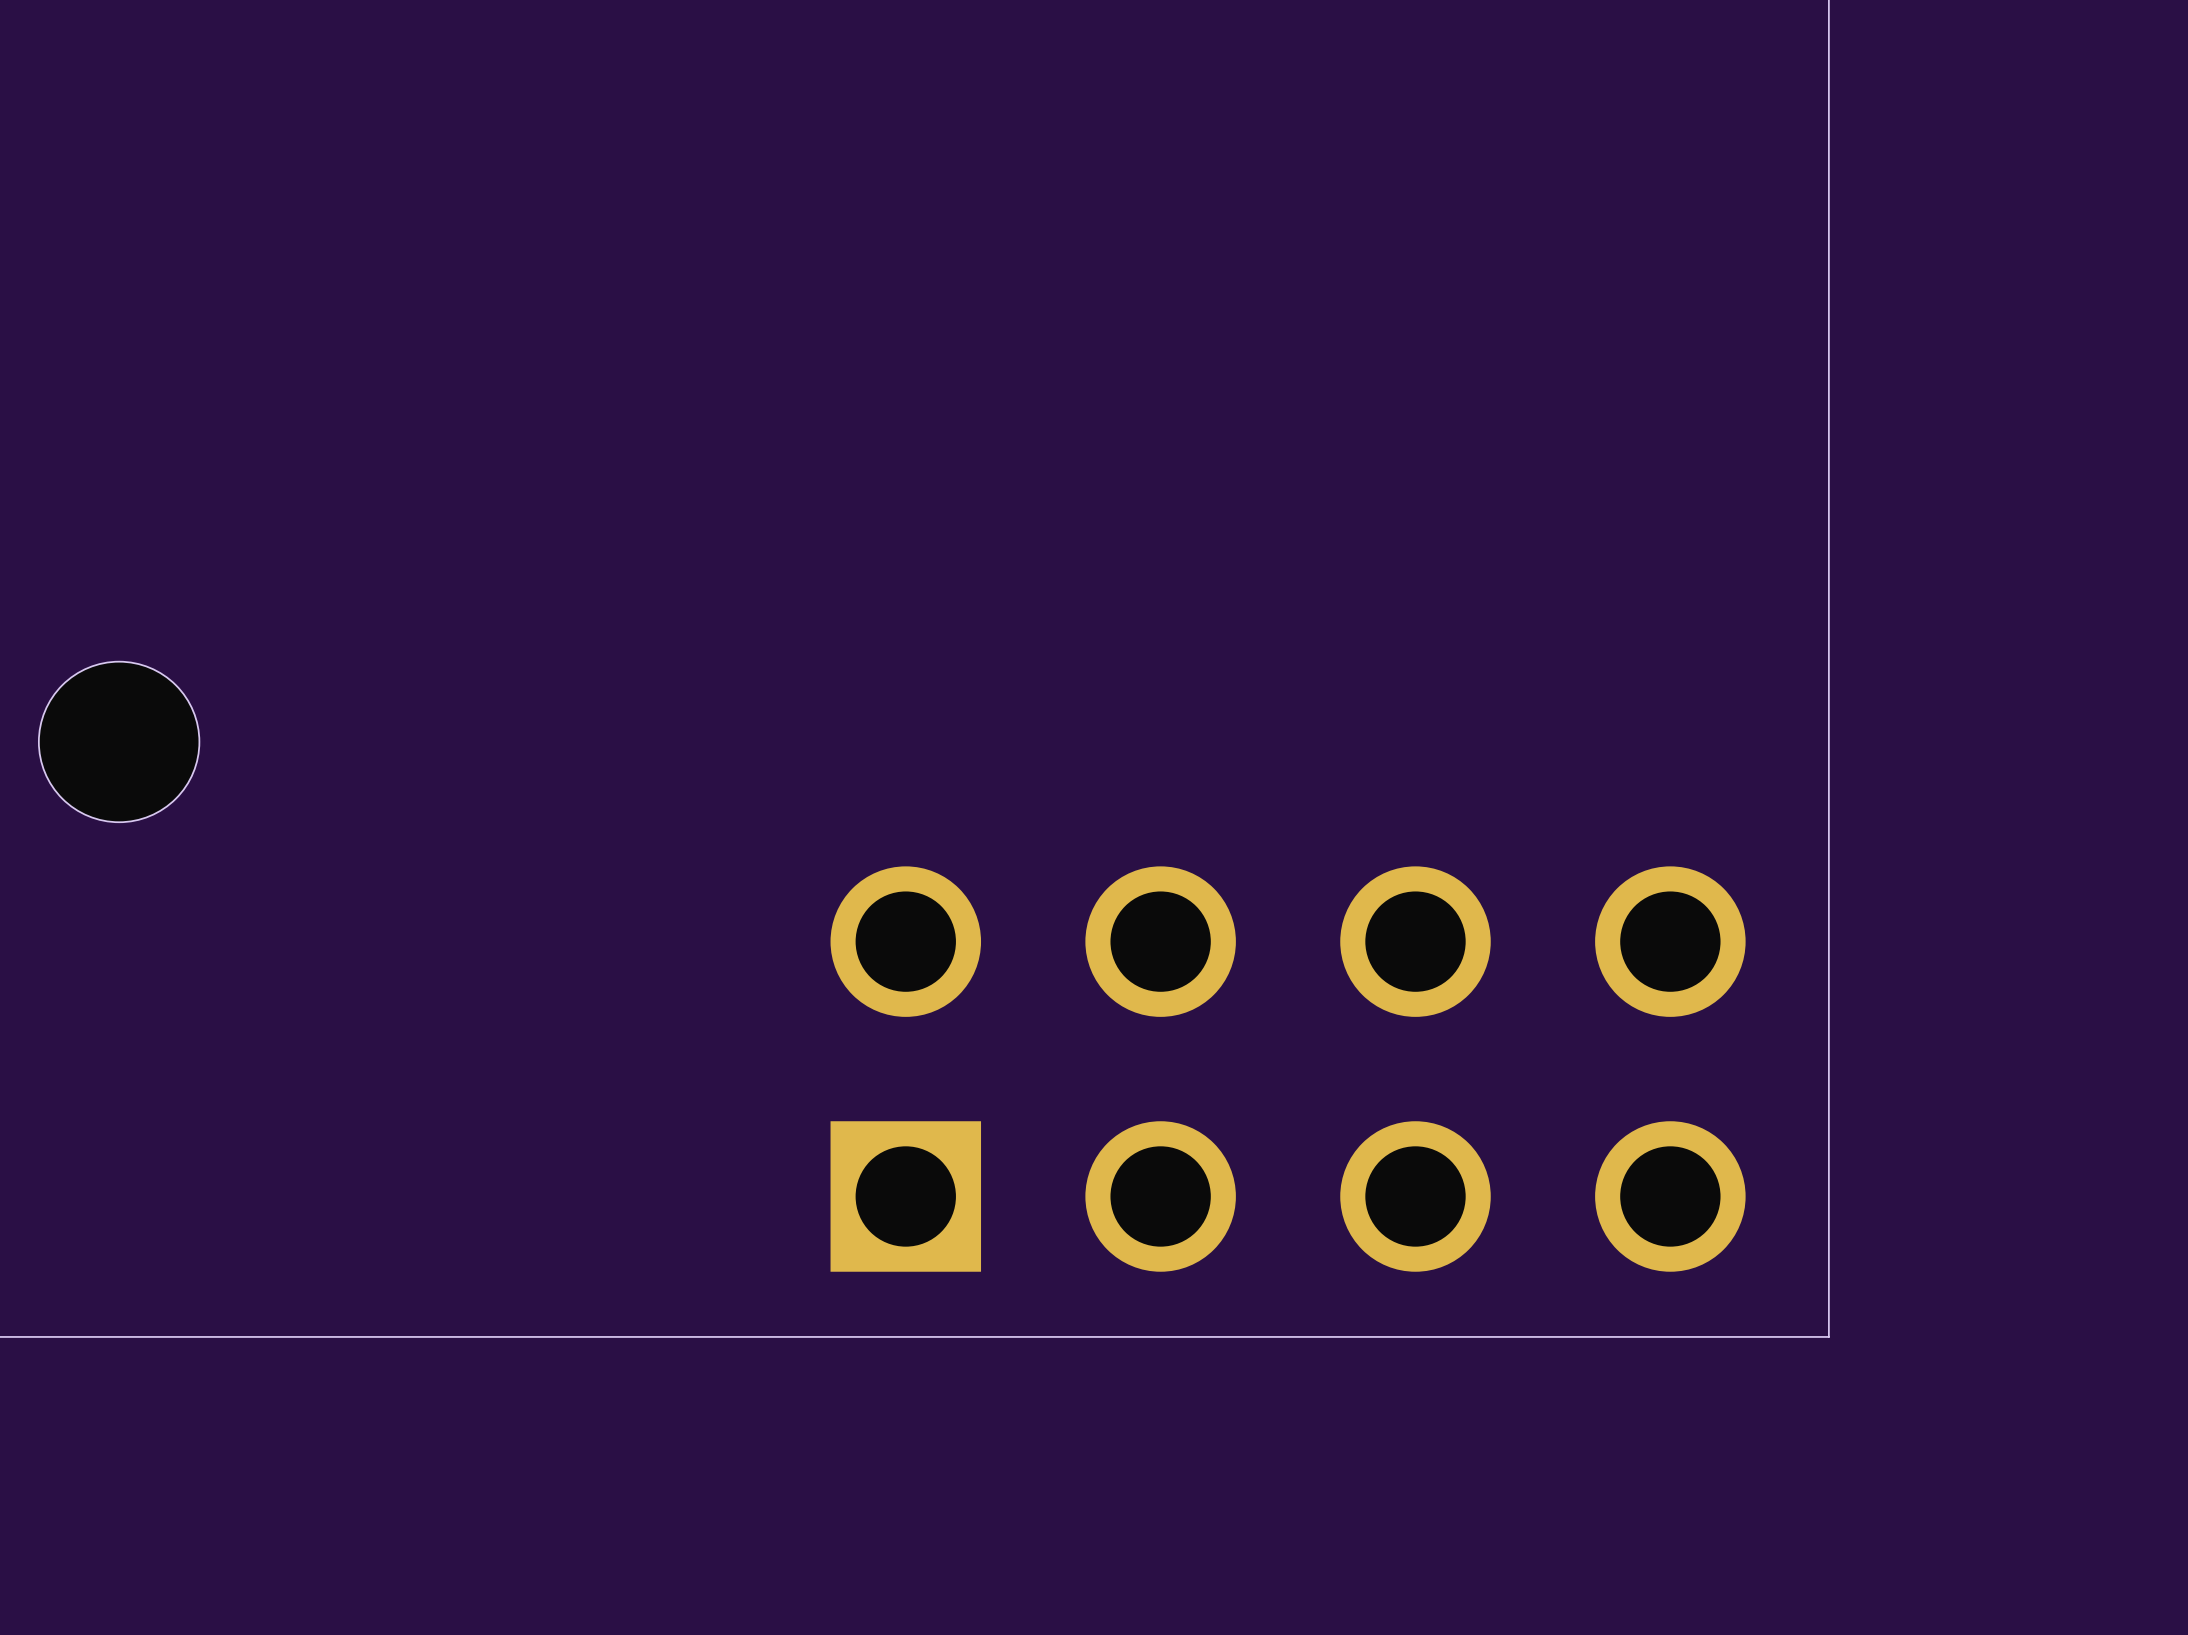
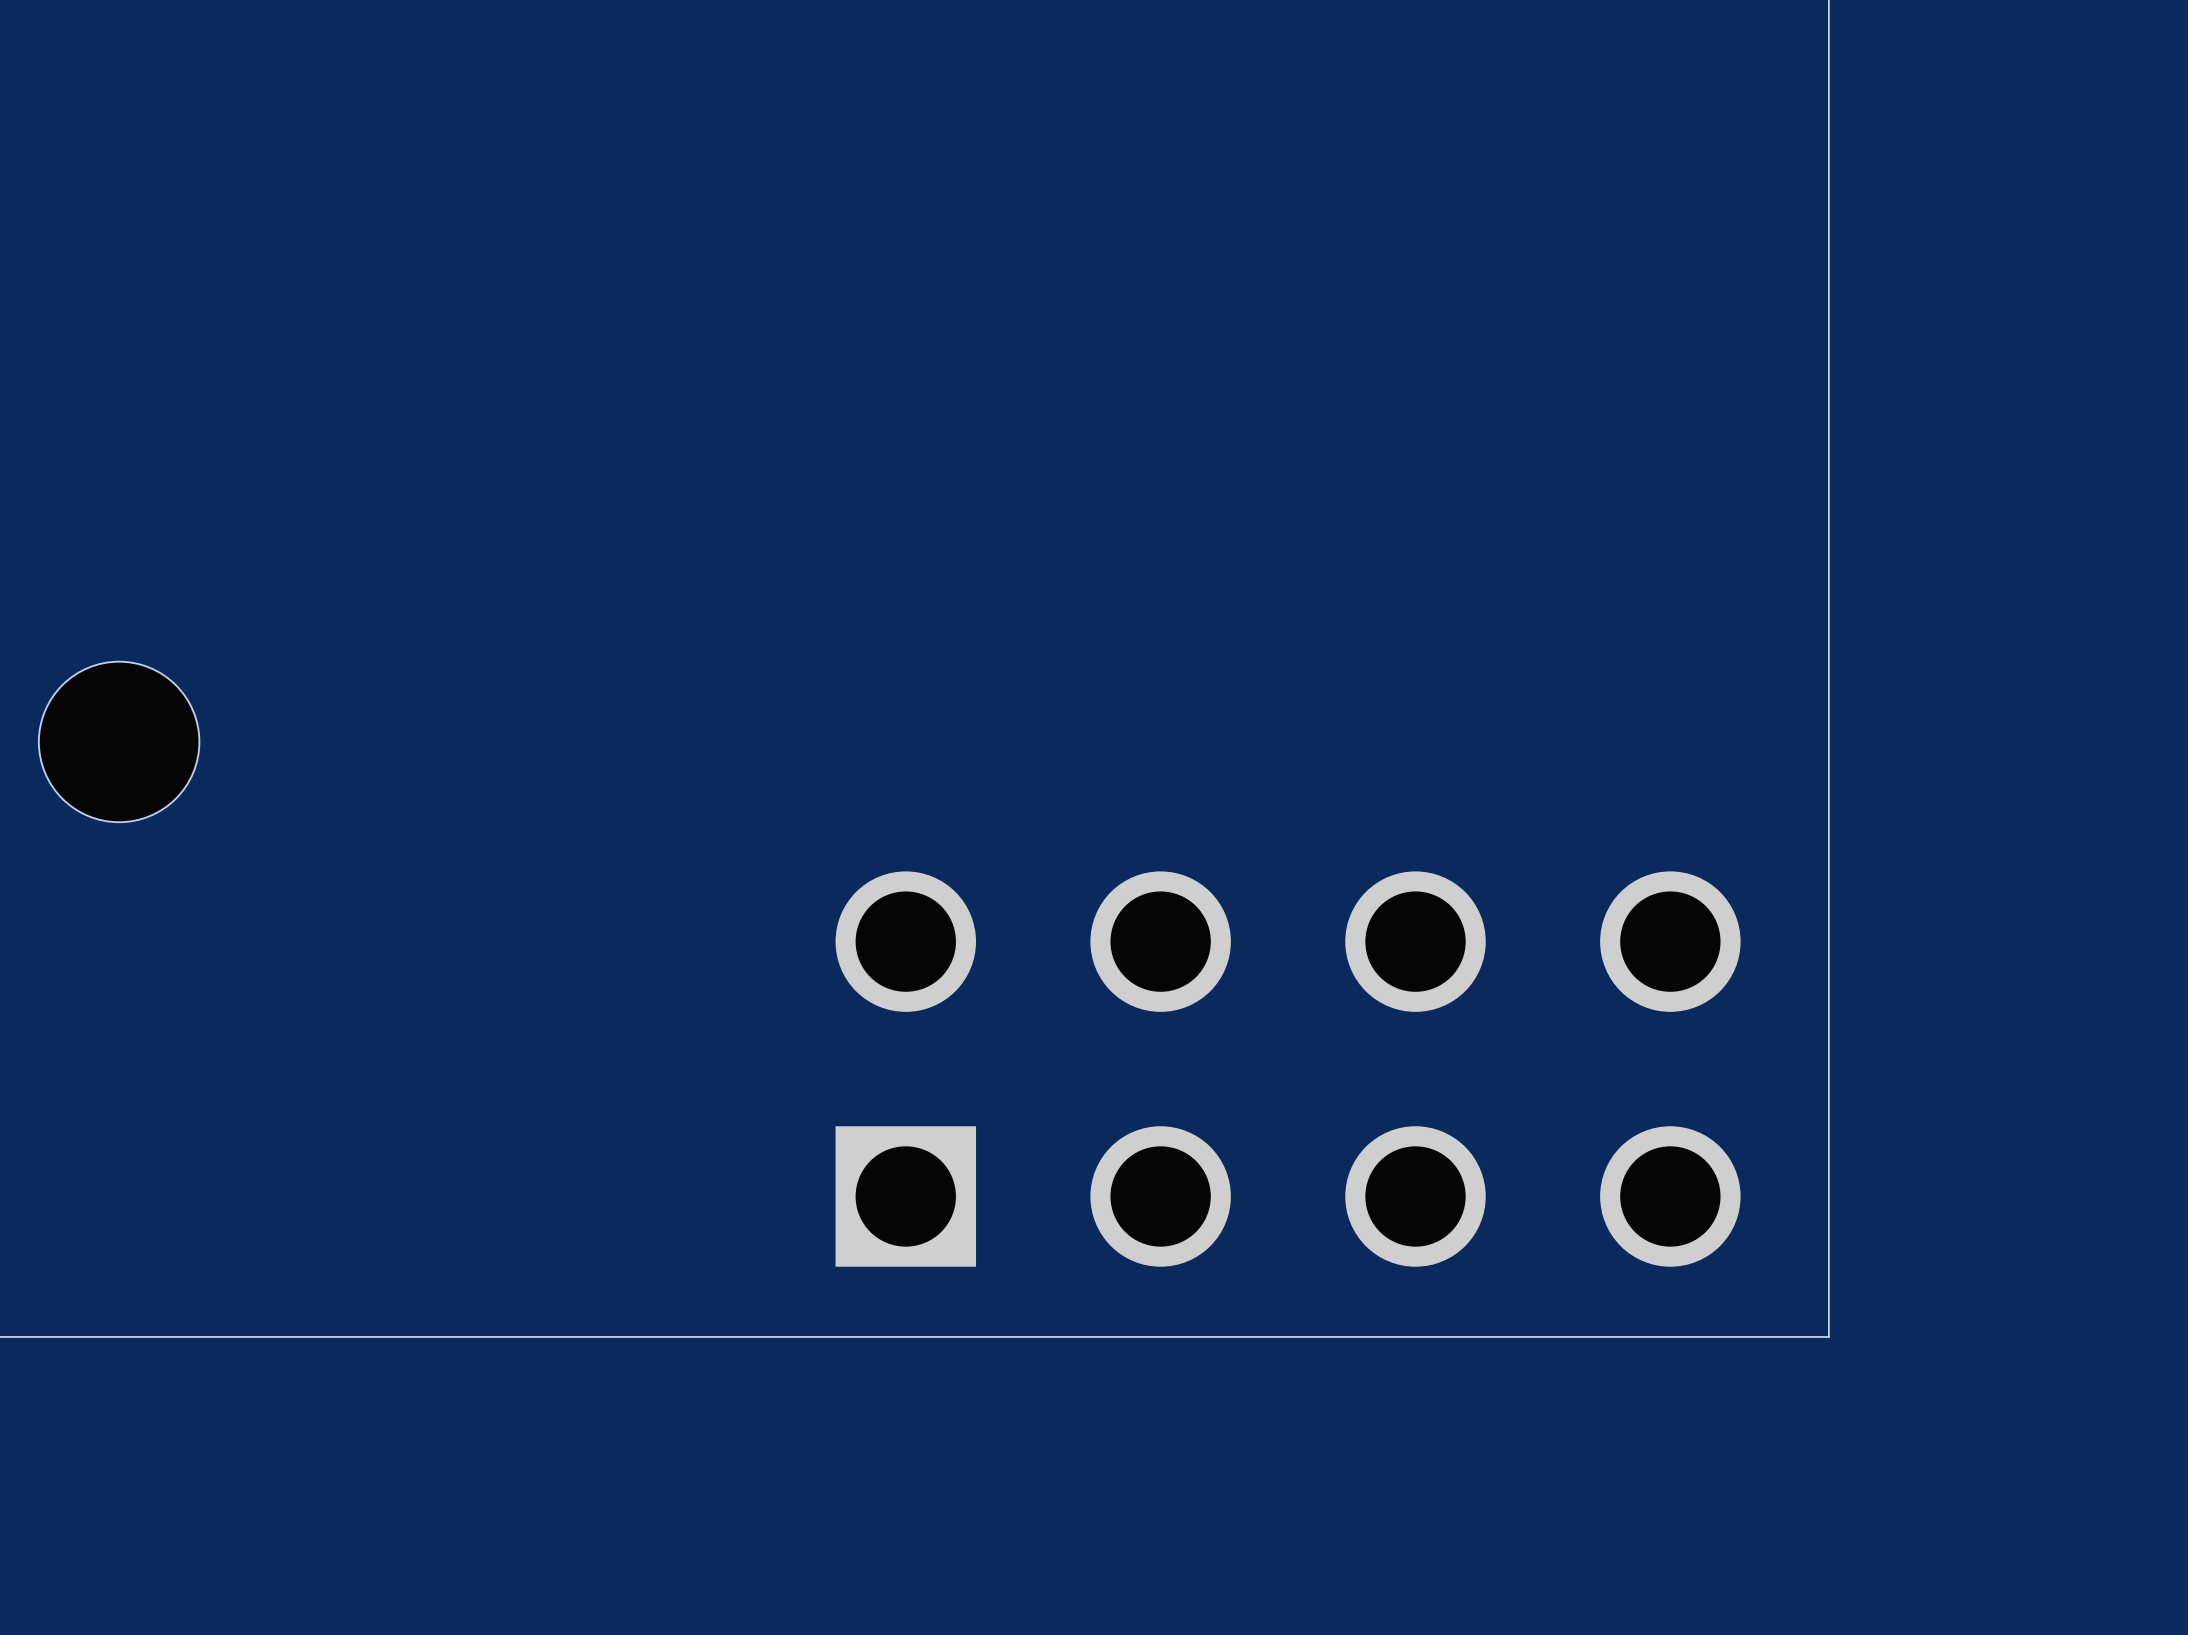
part footprint: [830, 866, 1746, 1272] -> [835, 871, 1741, 1267]

